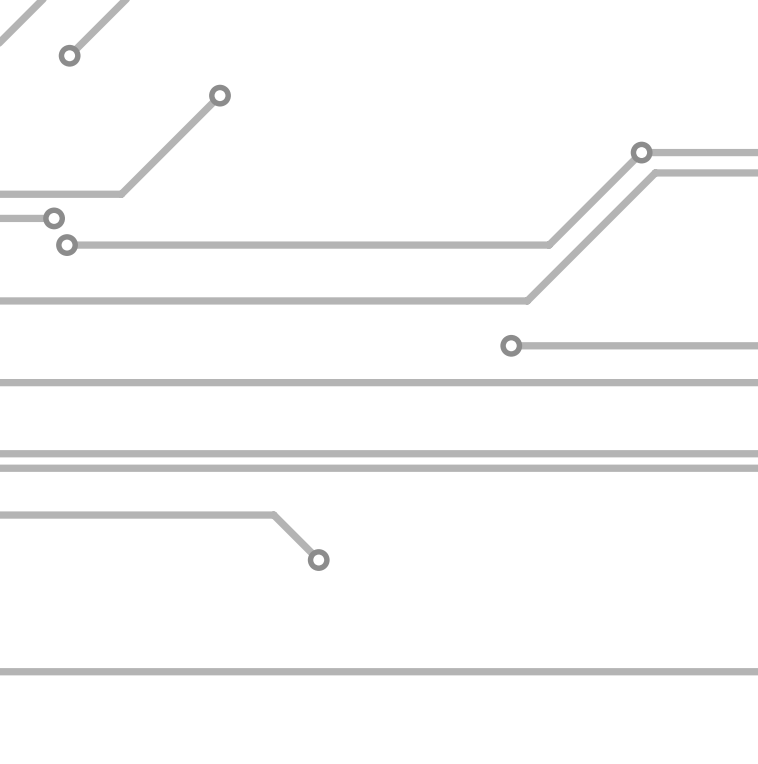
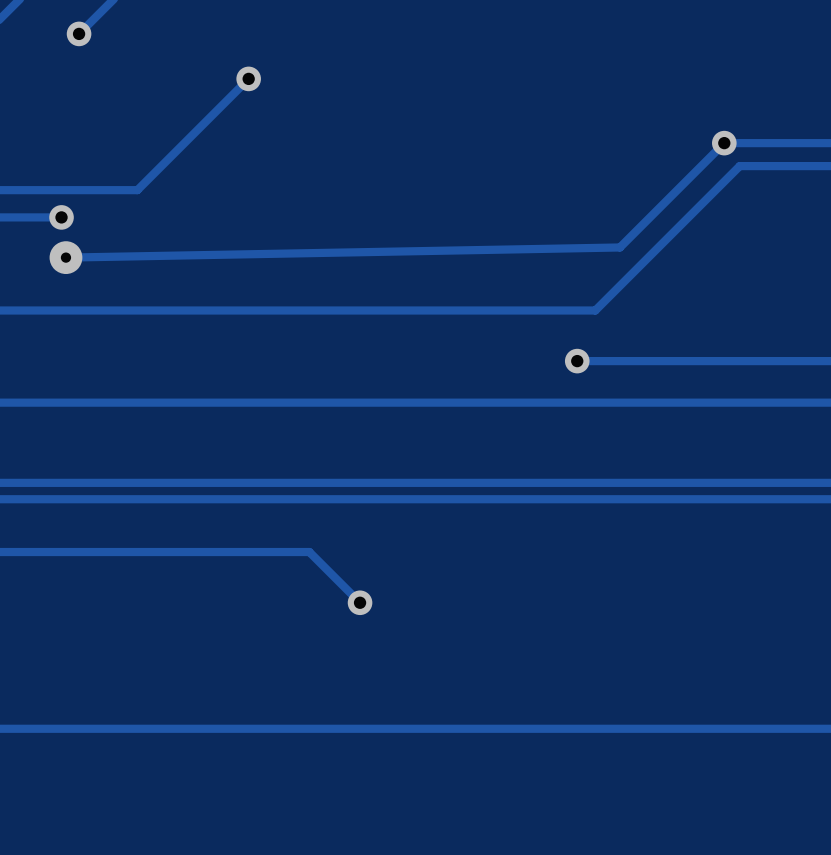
via size: [56, 234, 78, 256] -> [49, 241, 83, 275]
track: (549, 245) (67, 245) -> (619, 247) (65, 257)

